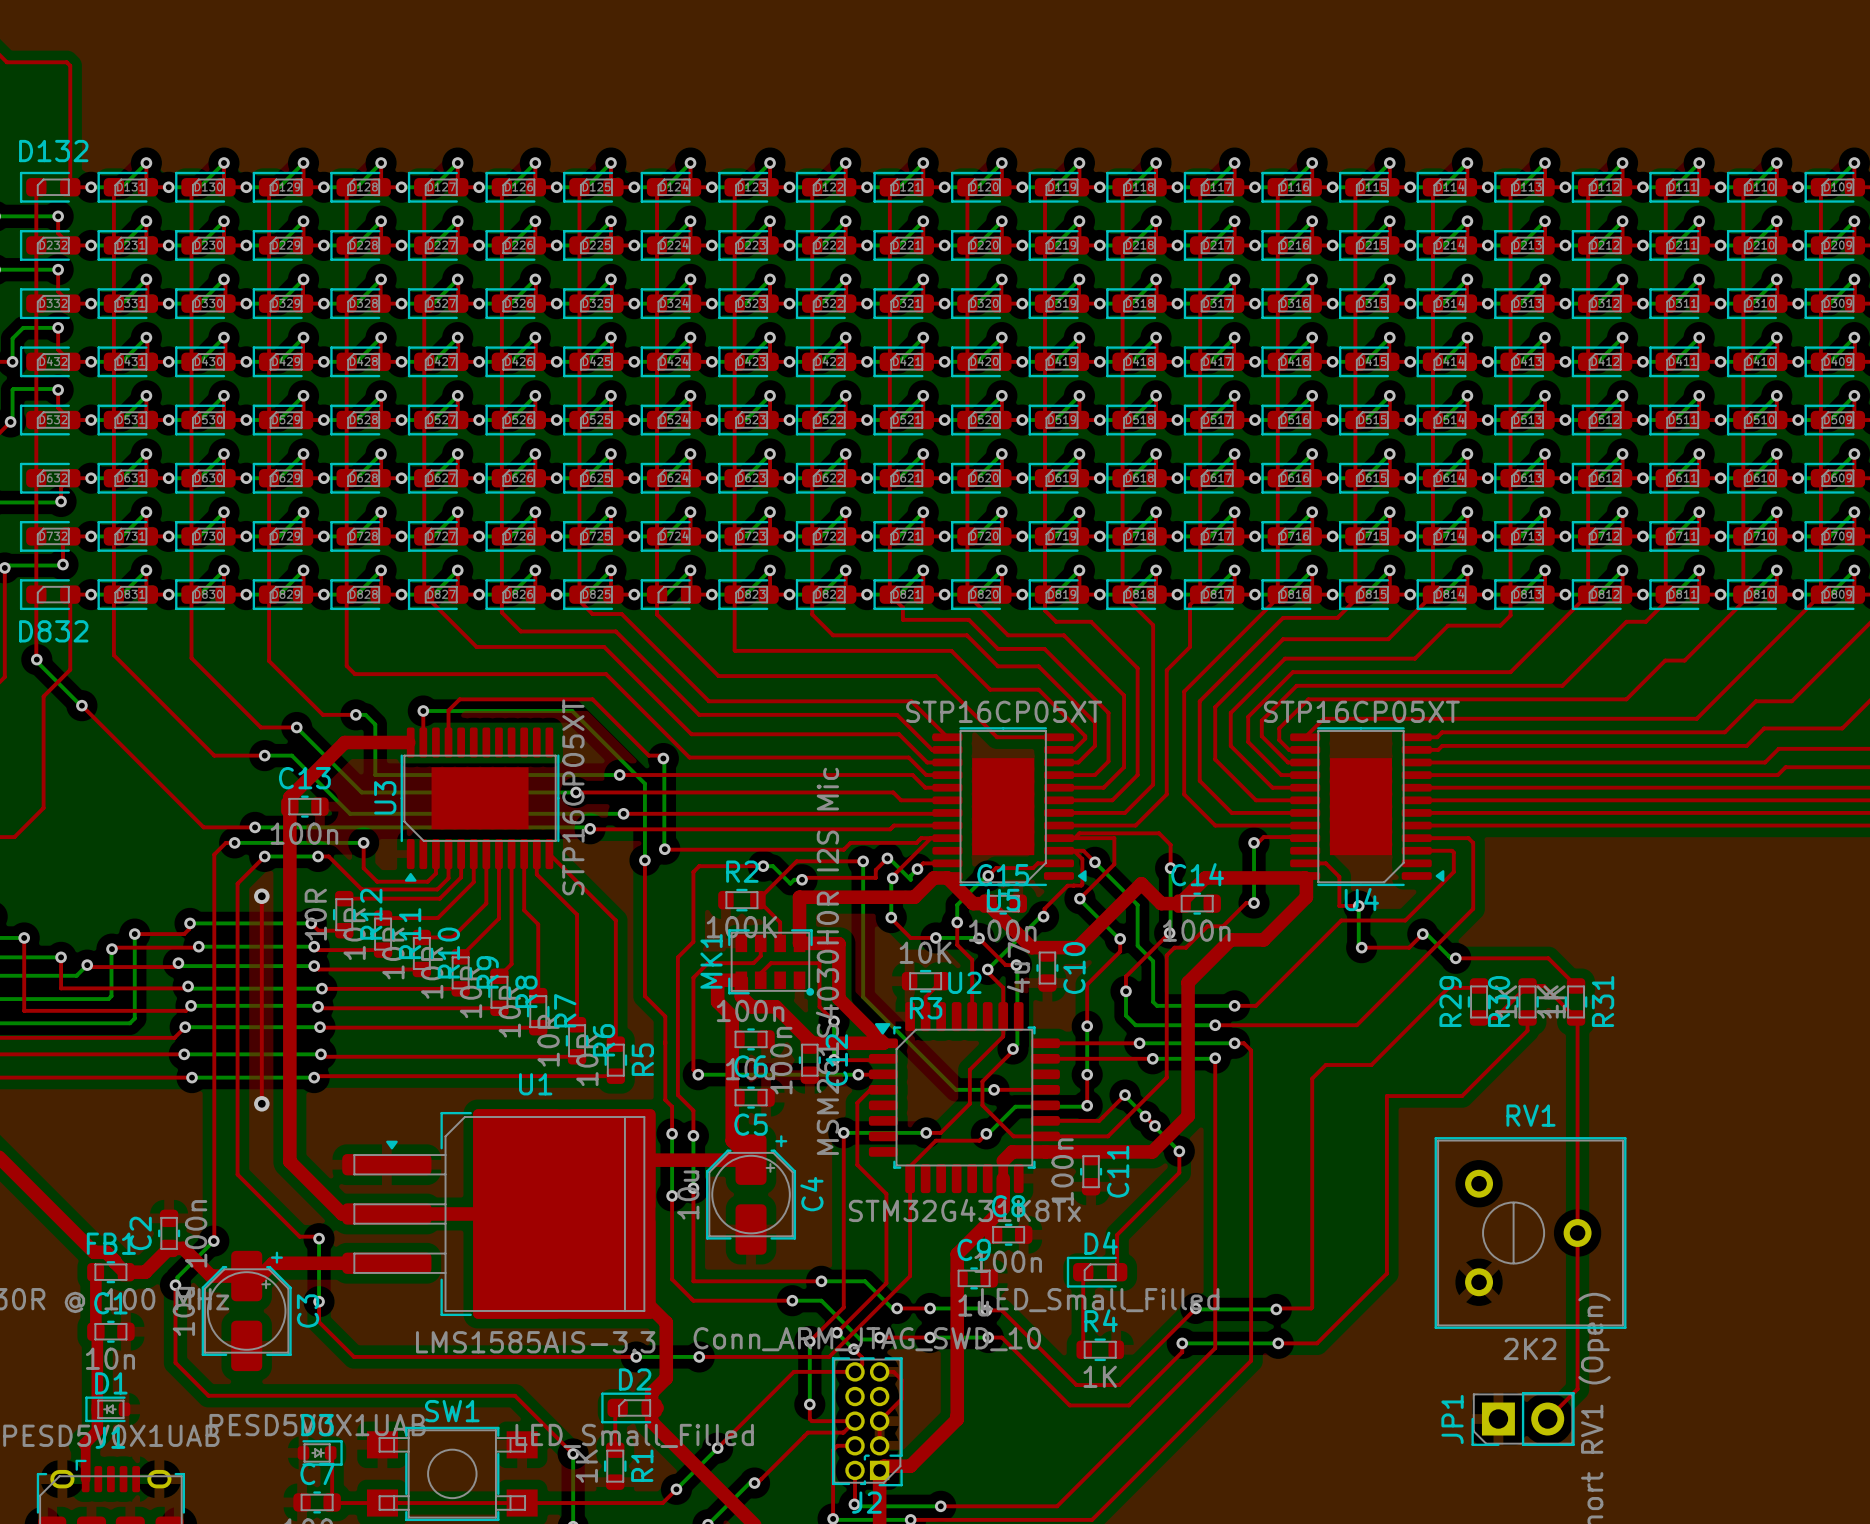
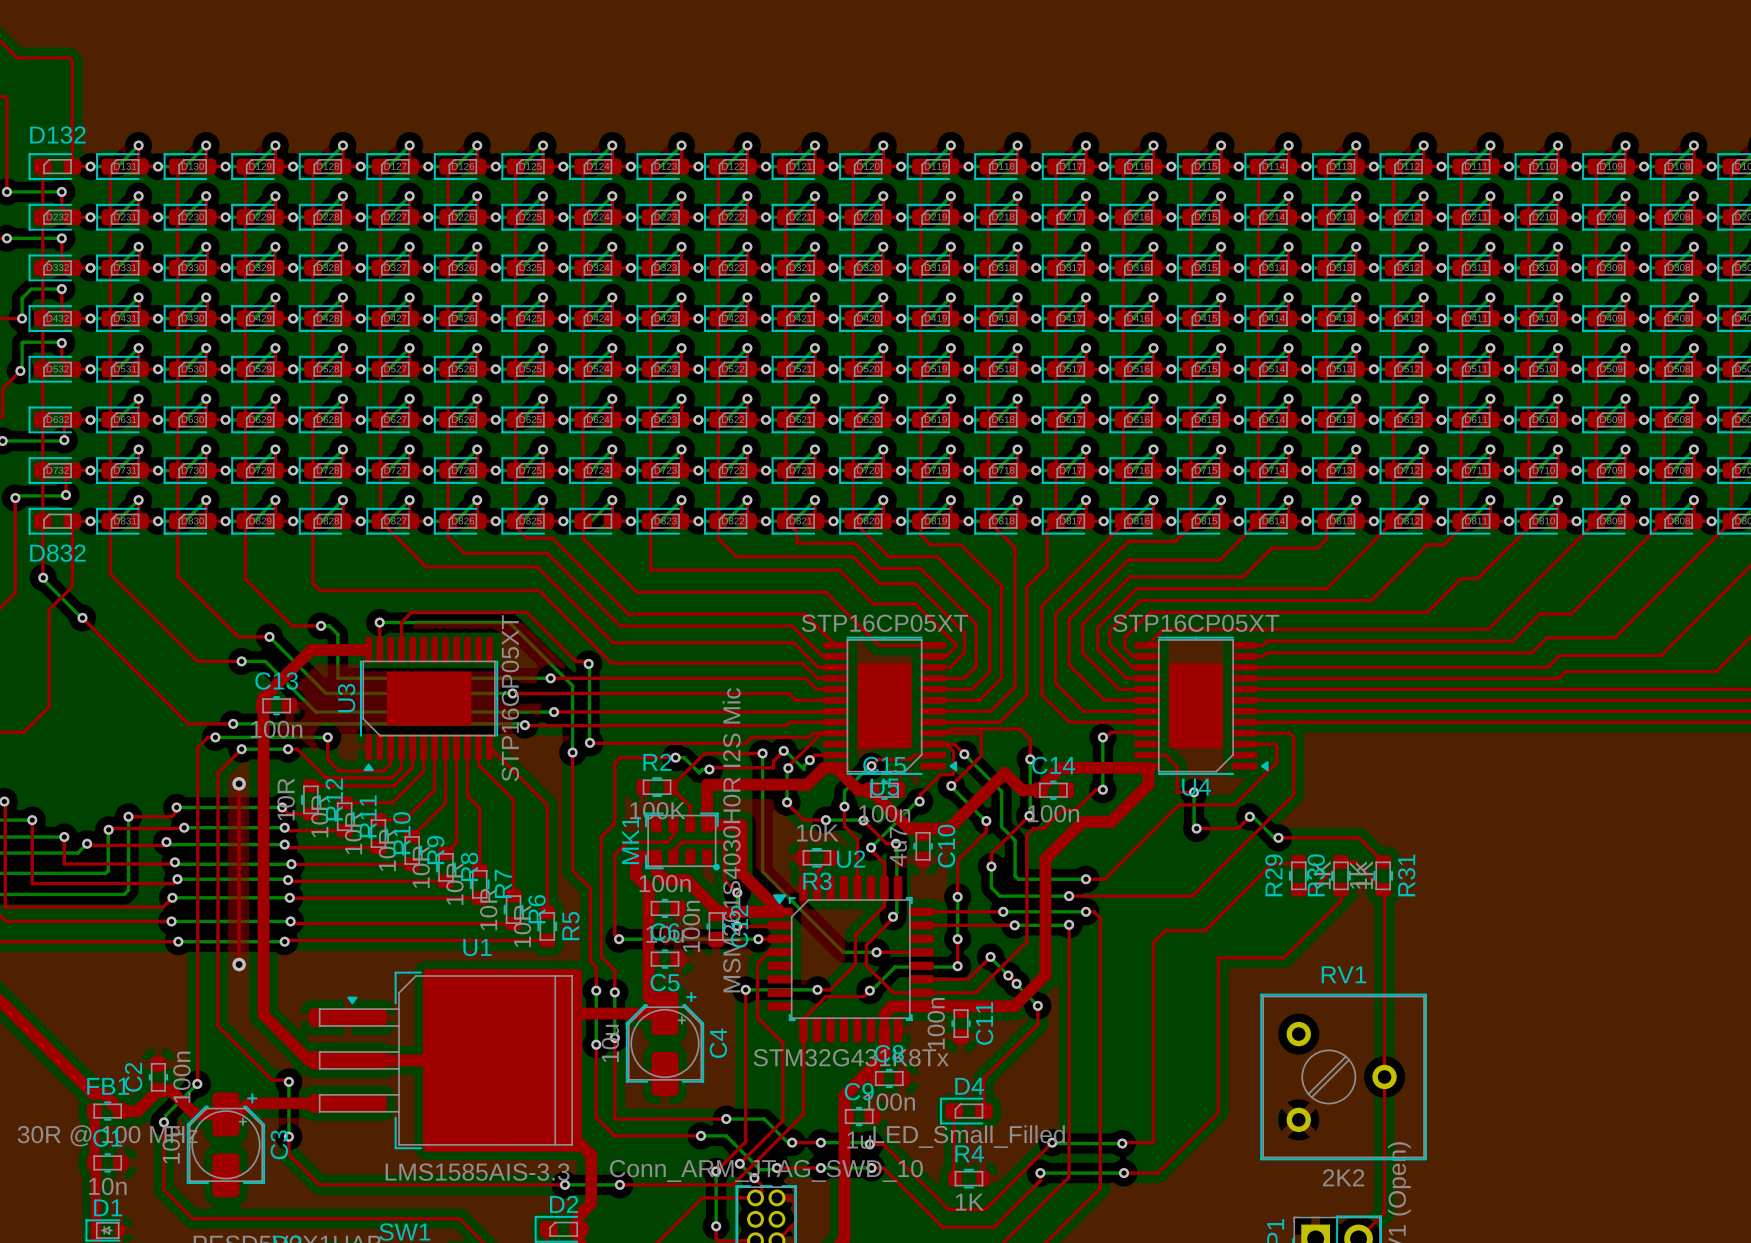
RV1 footprint: [1434, 1137, 1627, 1329] -> [1260, 993, 1427, 1161]

